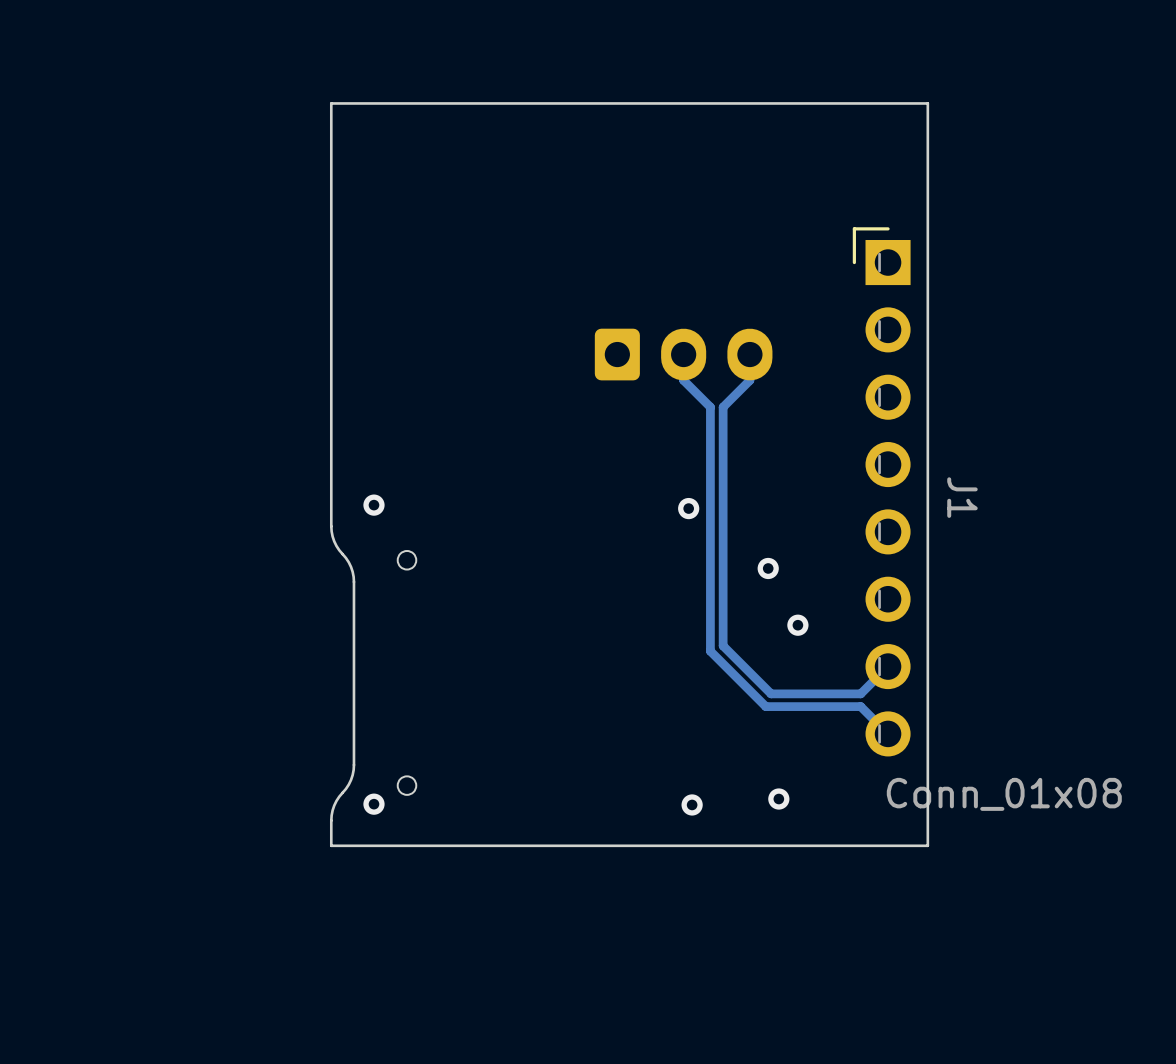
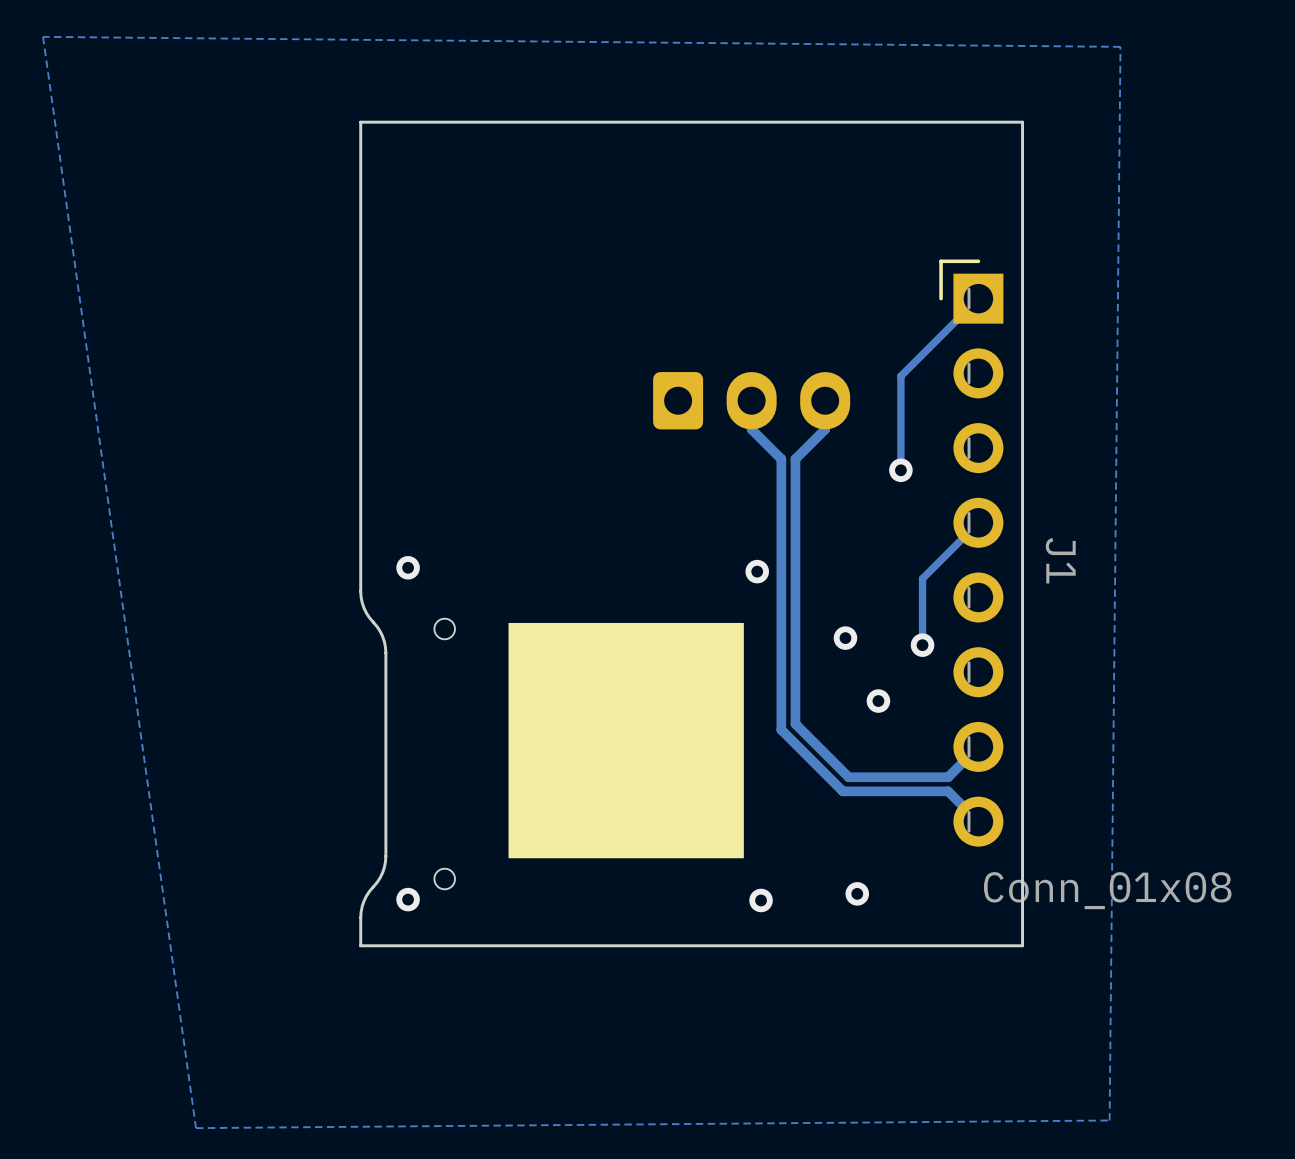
zone outline: none -> (43, 36) (1120, 46) (1109, 1120) (196, 1128) (43, 36)
track: none -> (978, 298) (900, 376) (900, 470)
via: none -> (900, 470)
track: none -> (978, 522) (922, 578) (922, 645)
via: none -> (922, 645)
part: none -> (626, 740)

